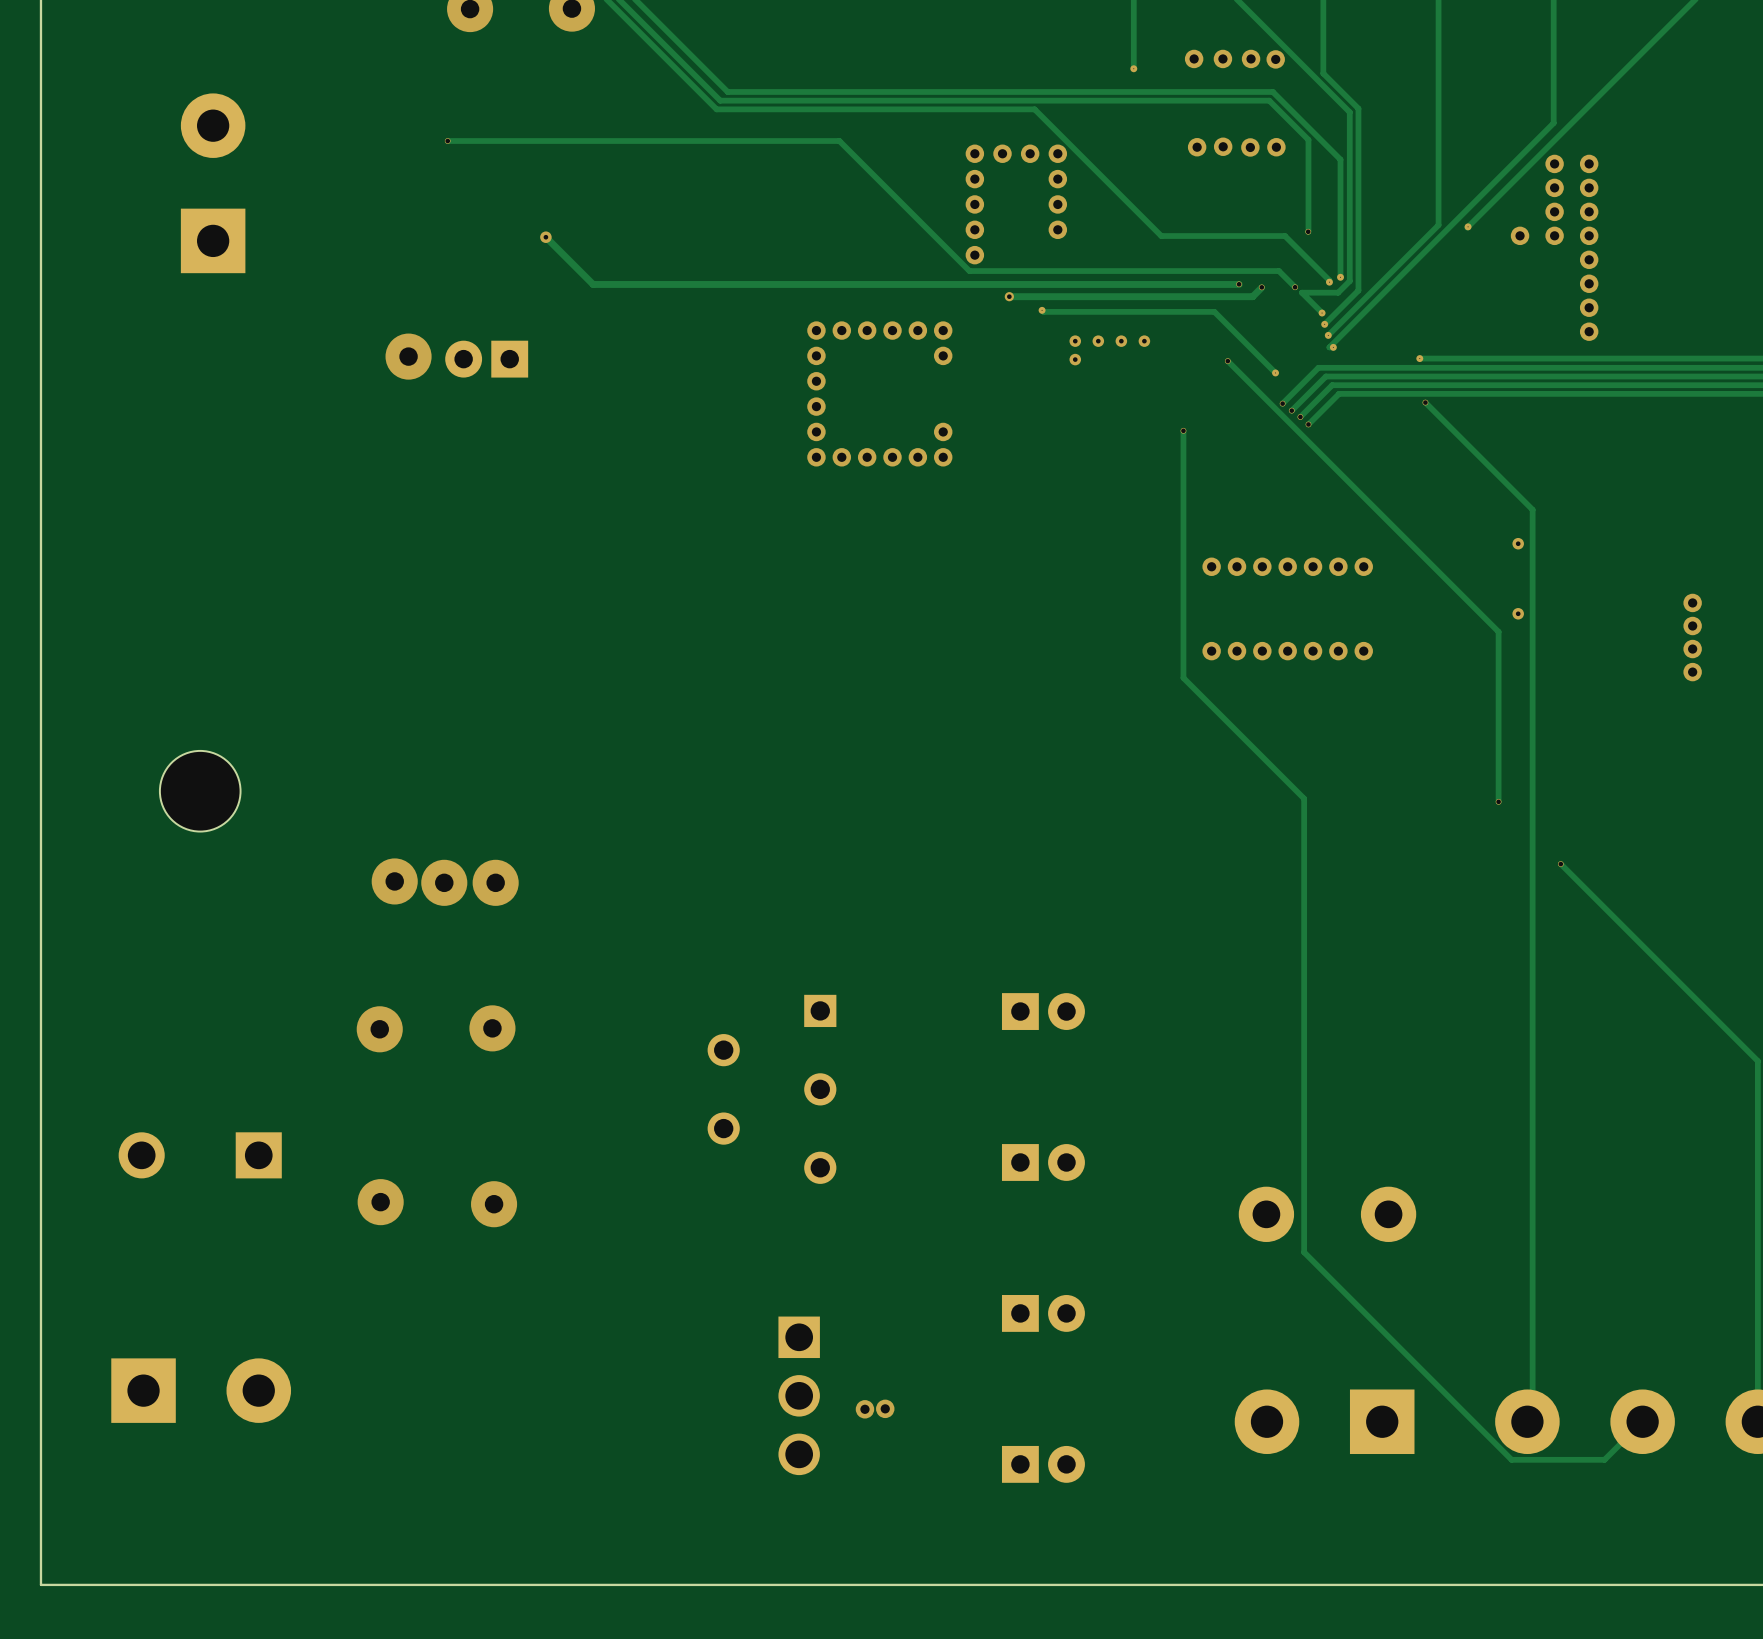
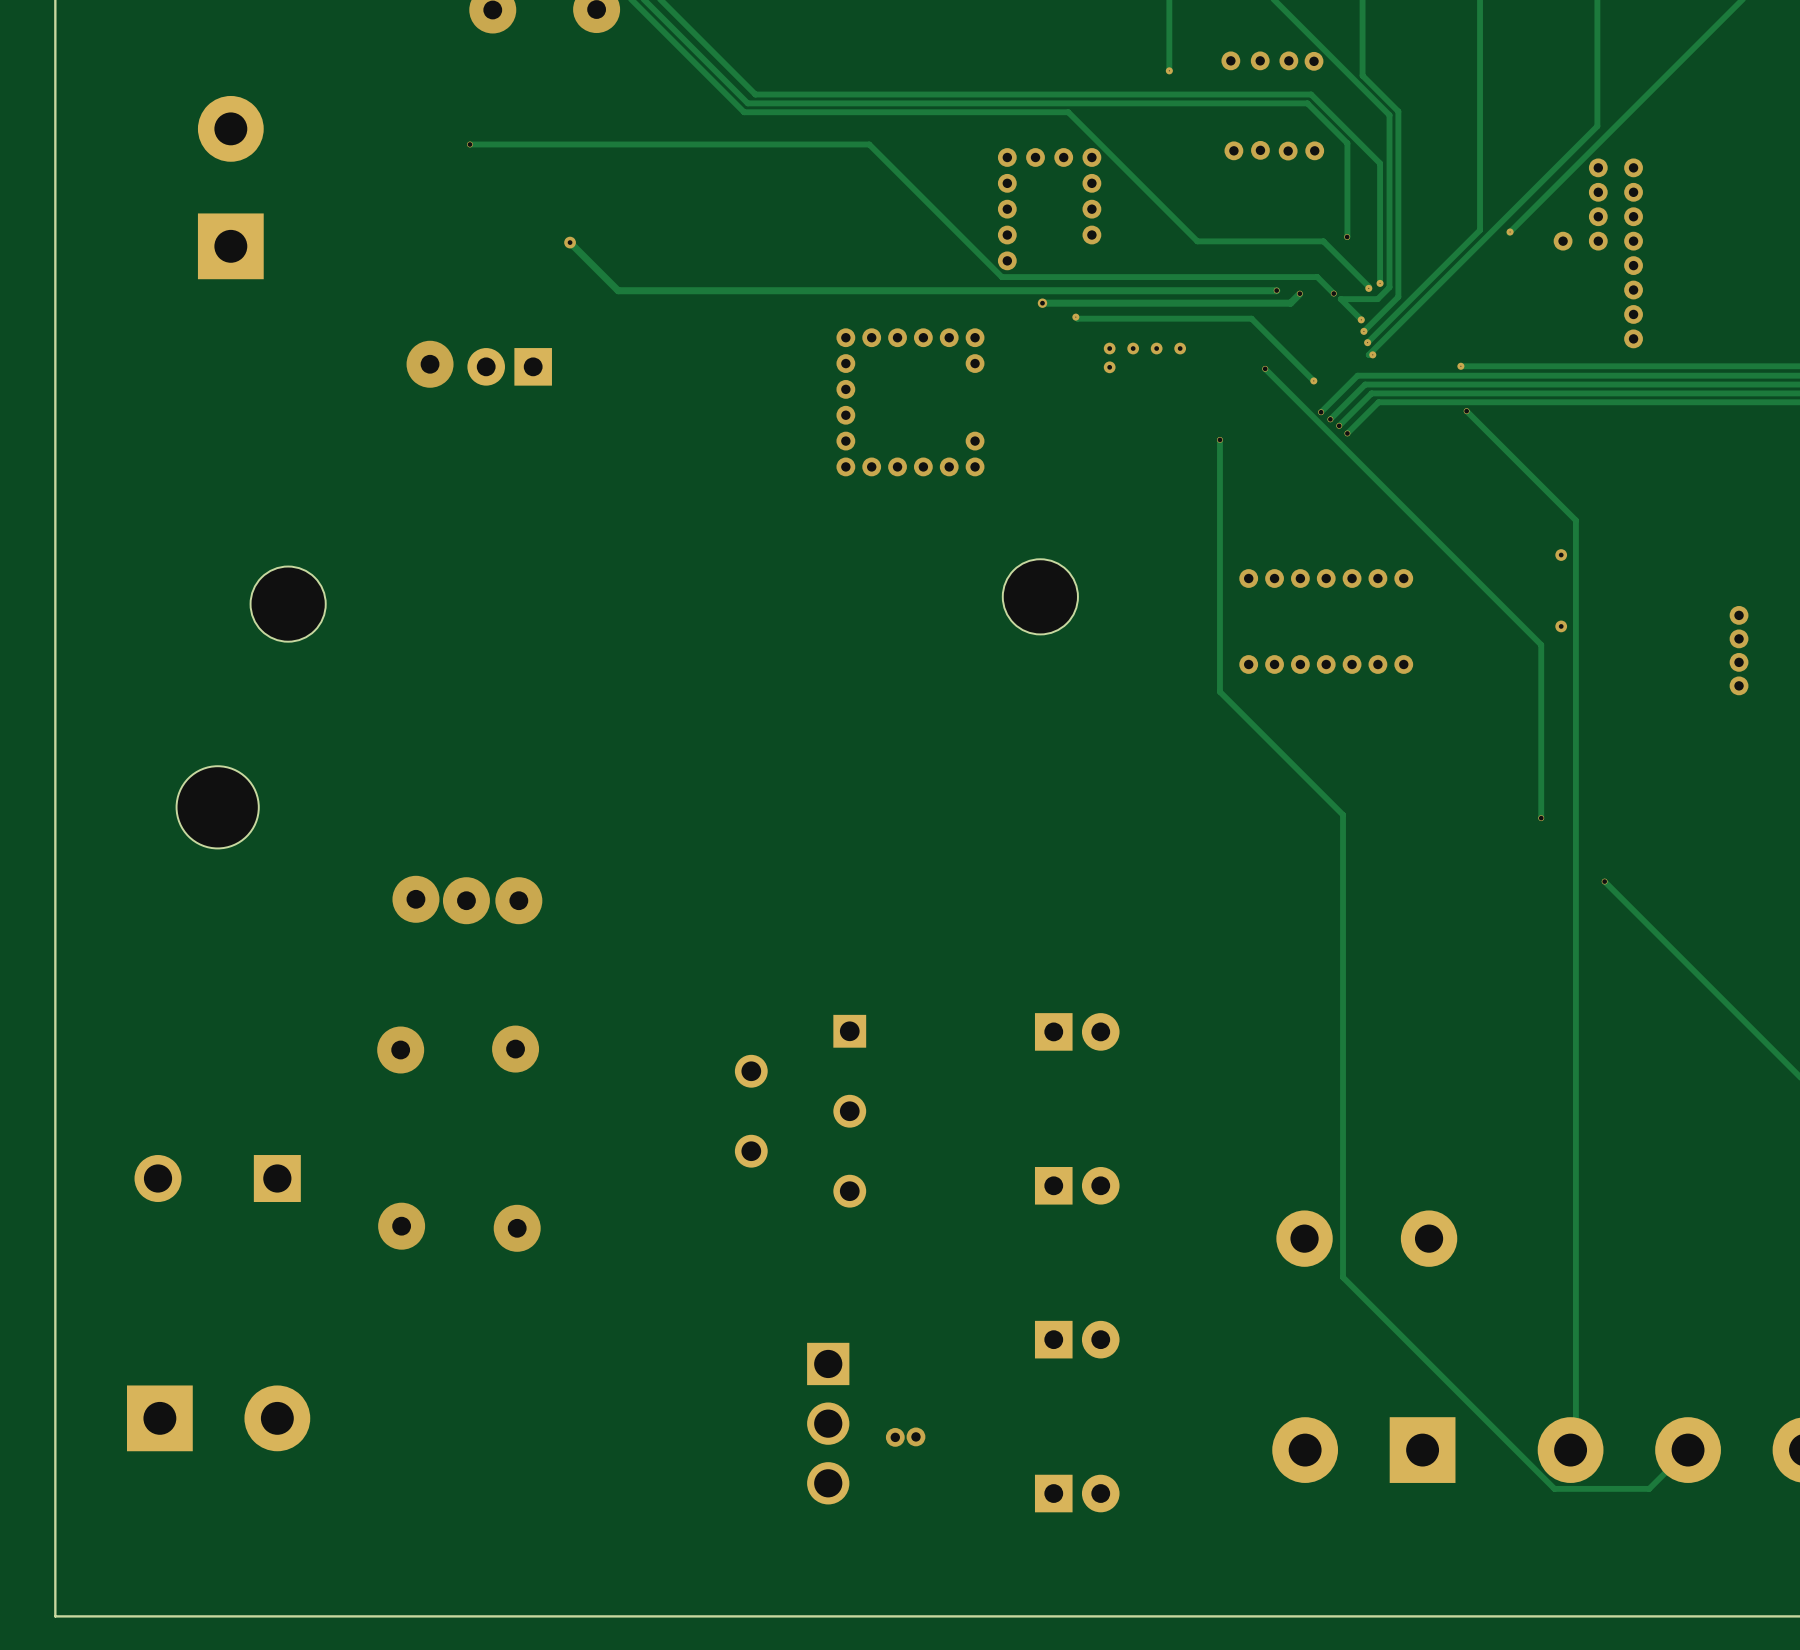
part: none -> (1040, 596)
part: none -> (288, 604)

